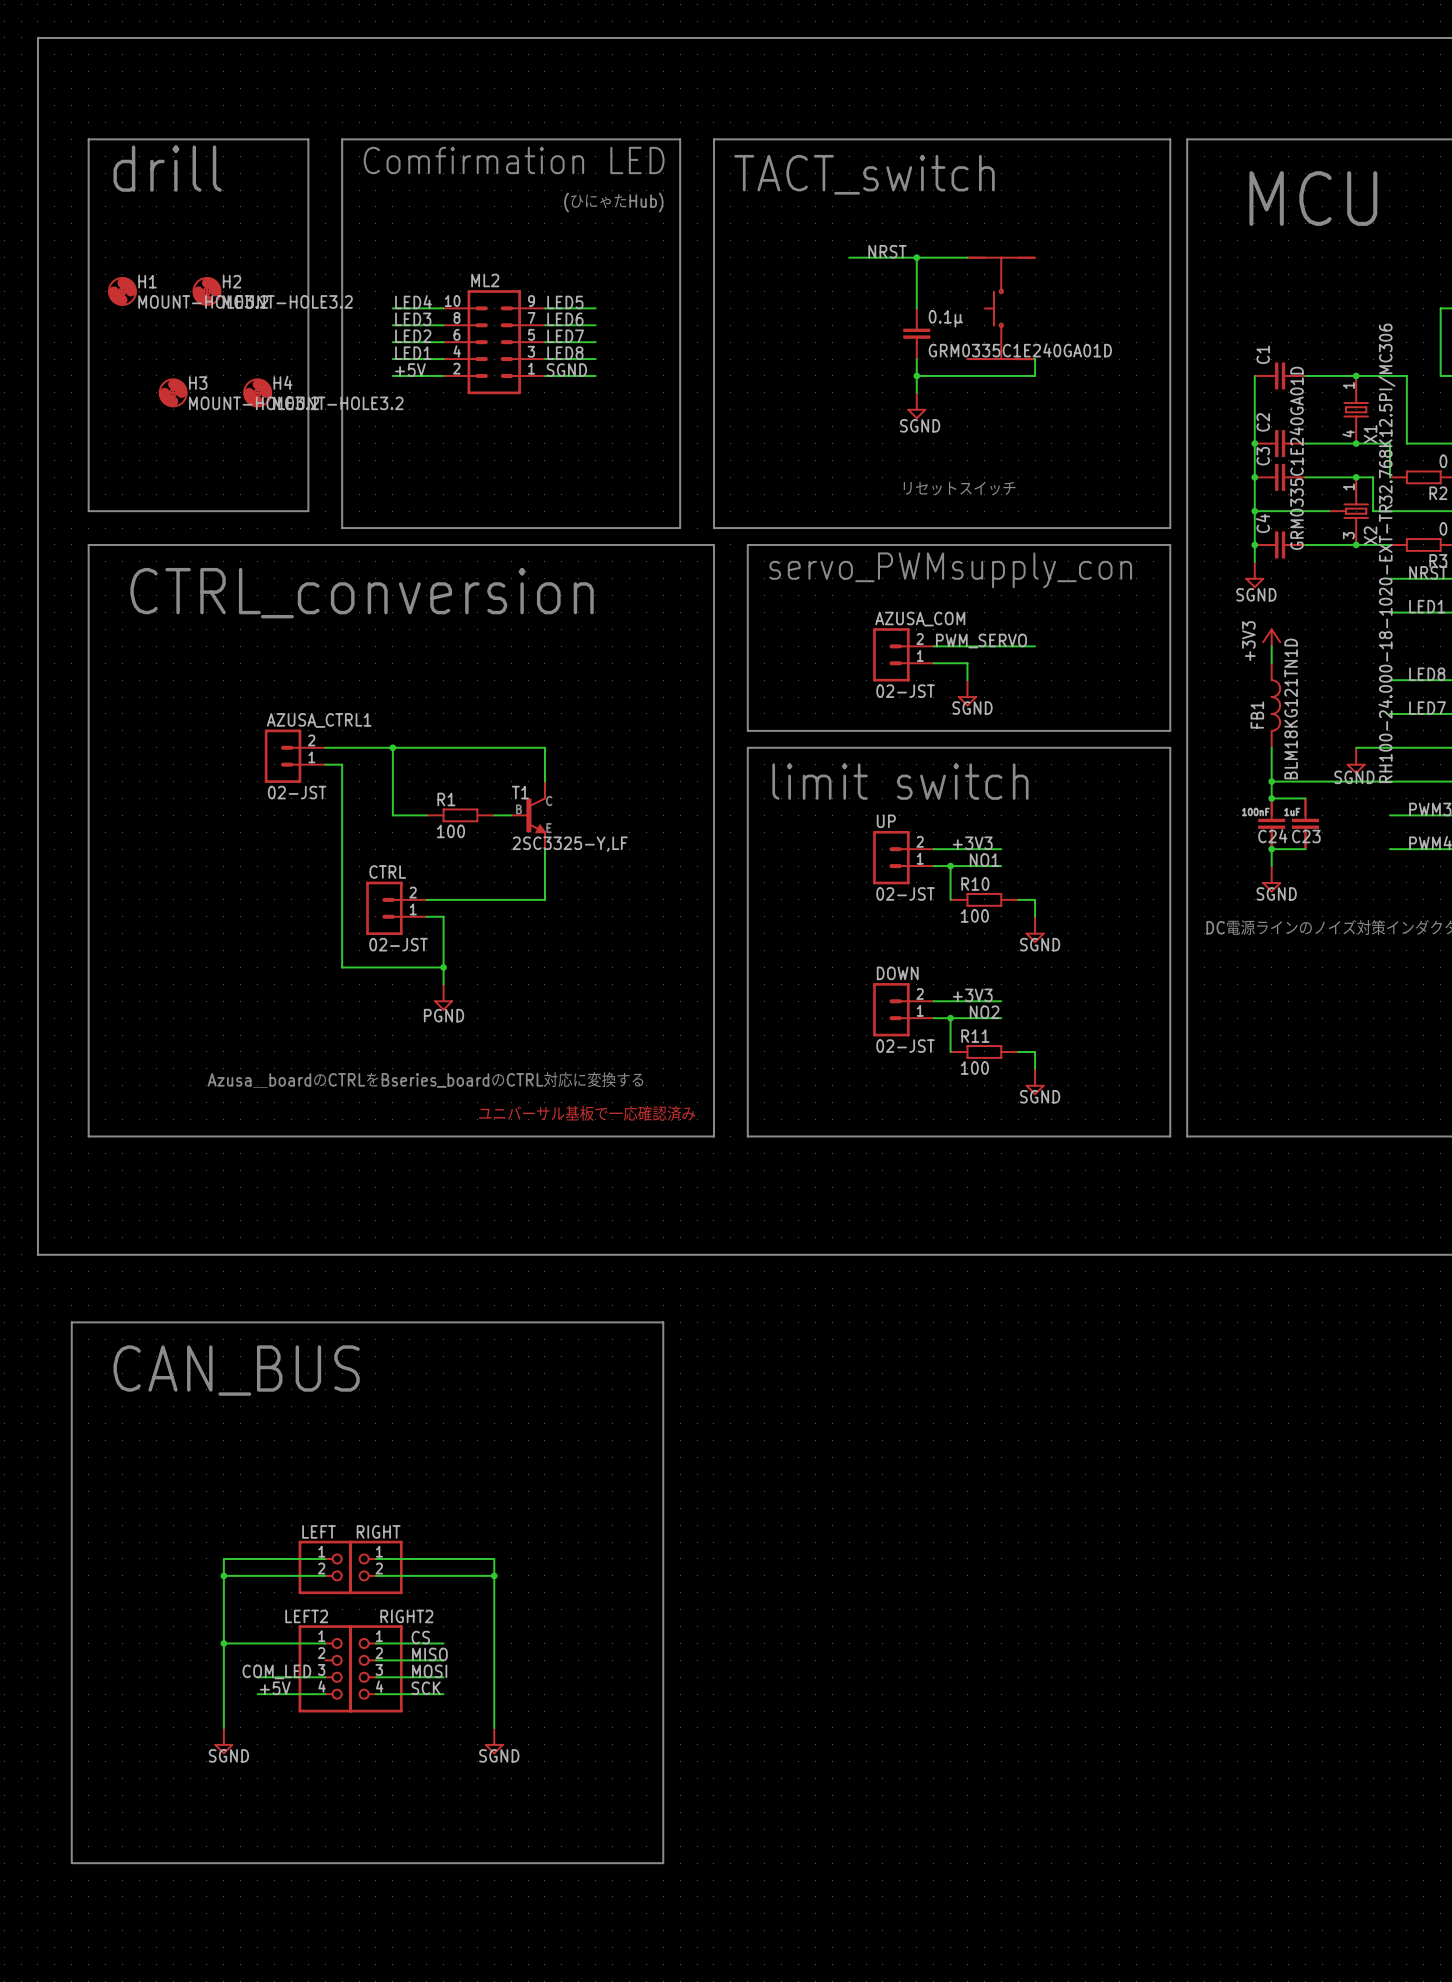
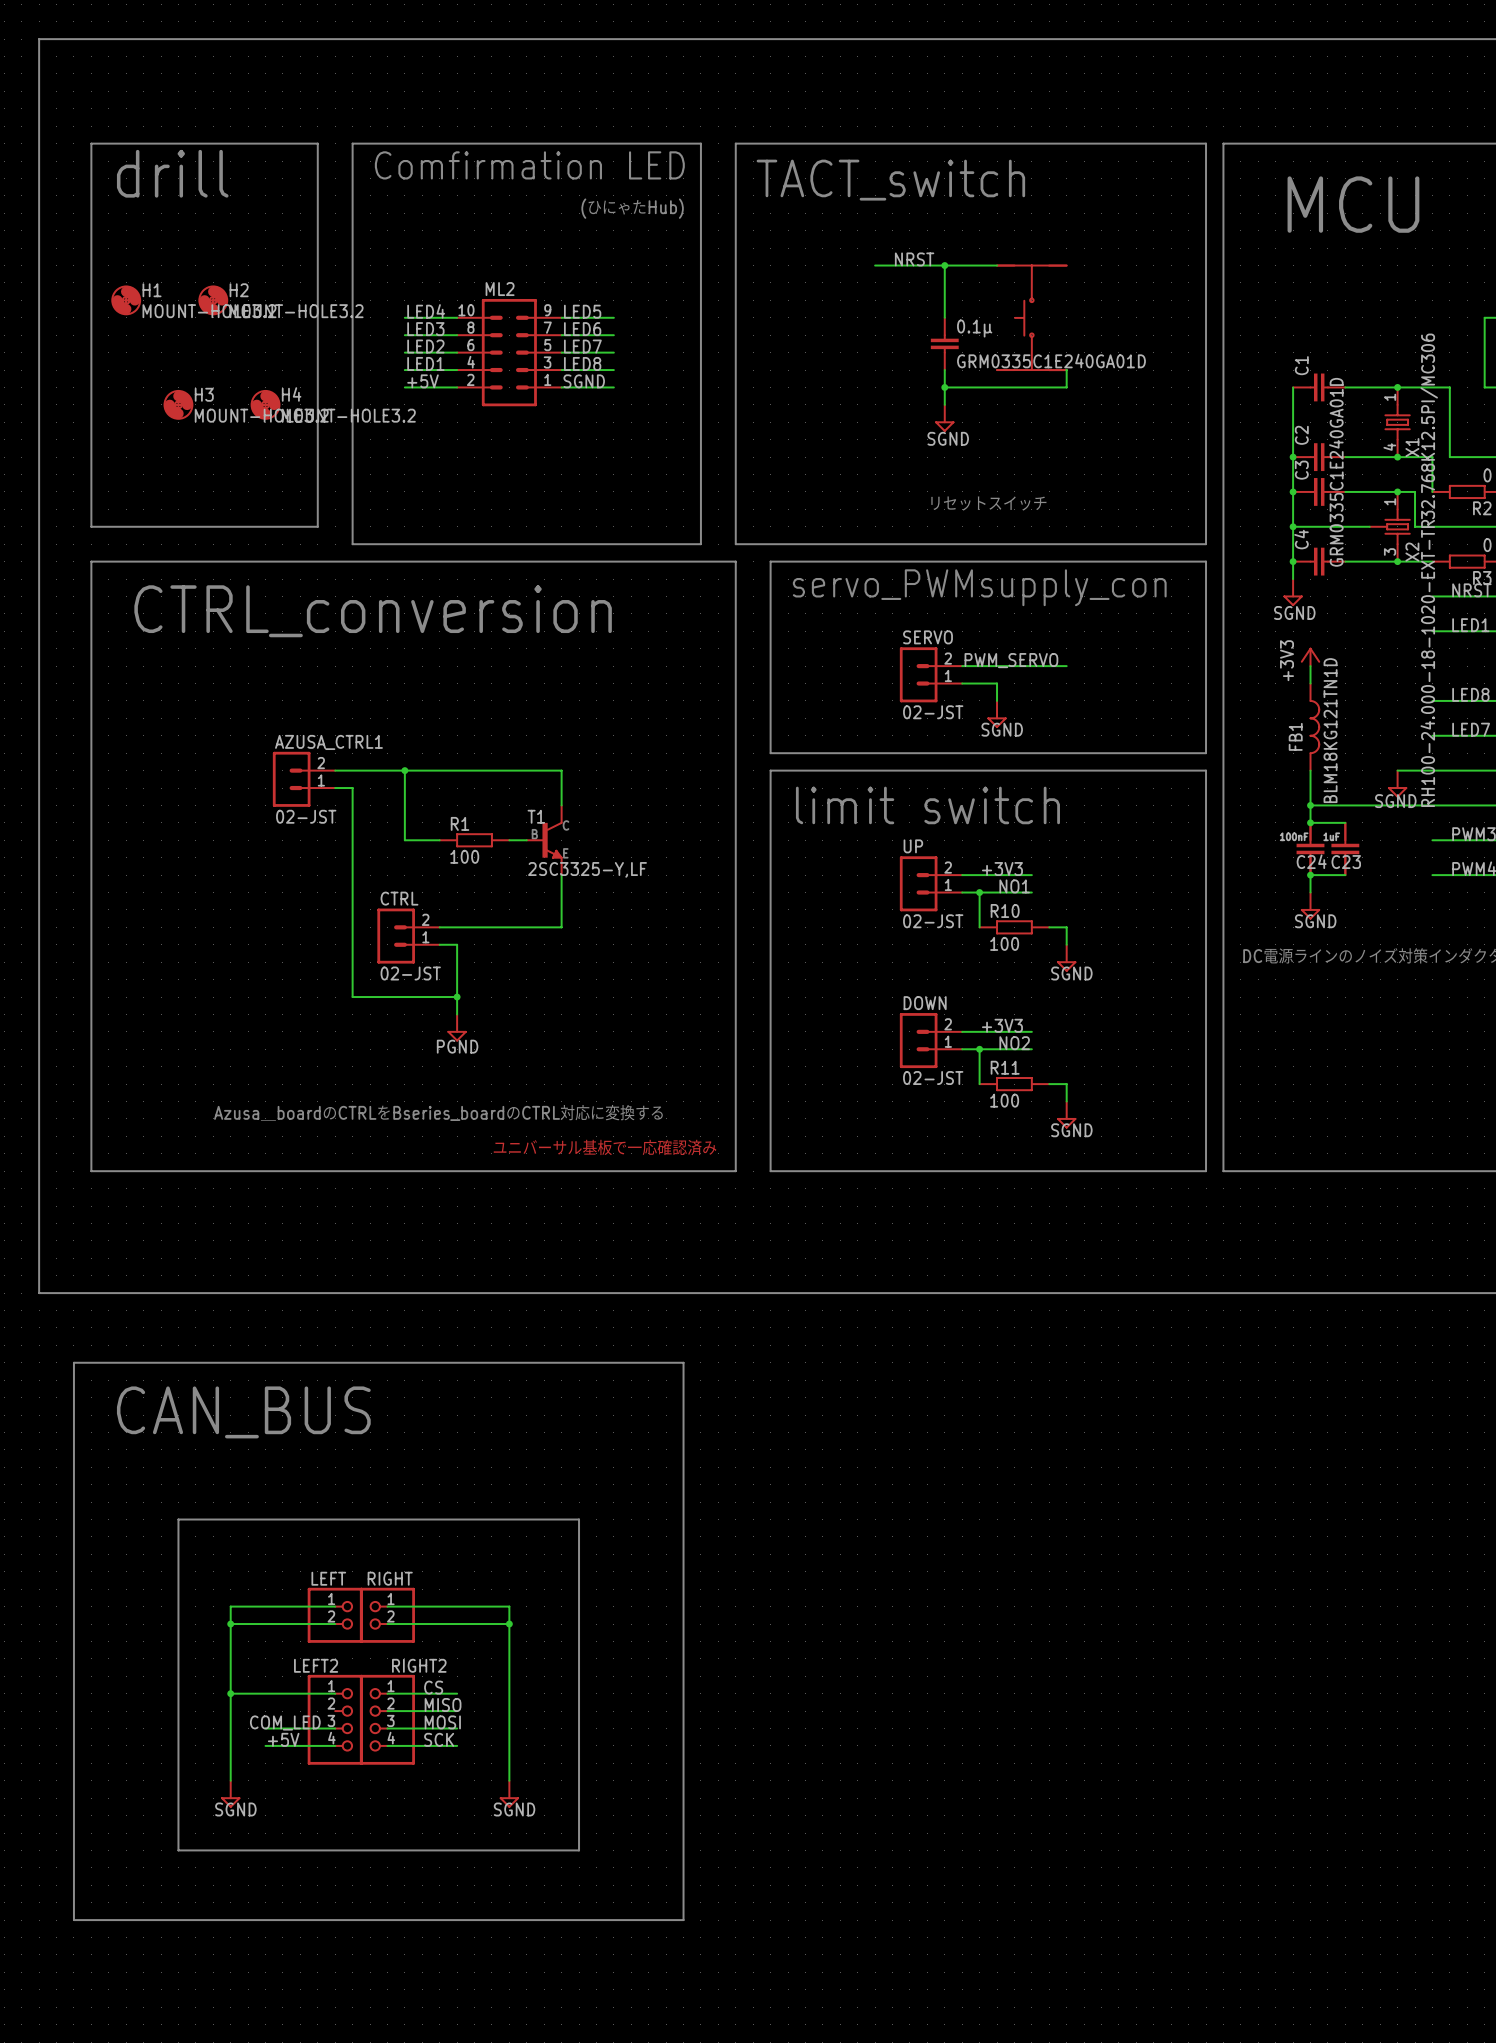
AZUSA_COM name: AZUSA_COM (920, 619) -> SERVO (928, 637)
line: none -> (178, 1519) (178, 1850) (579, 1850) (579, 1519) (178, 1519)

